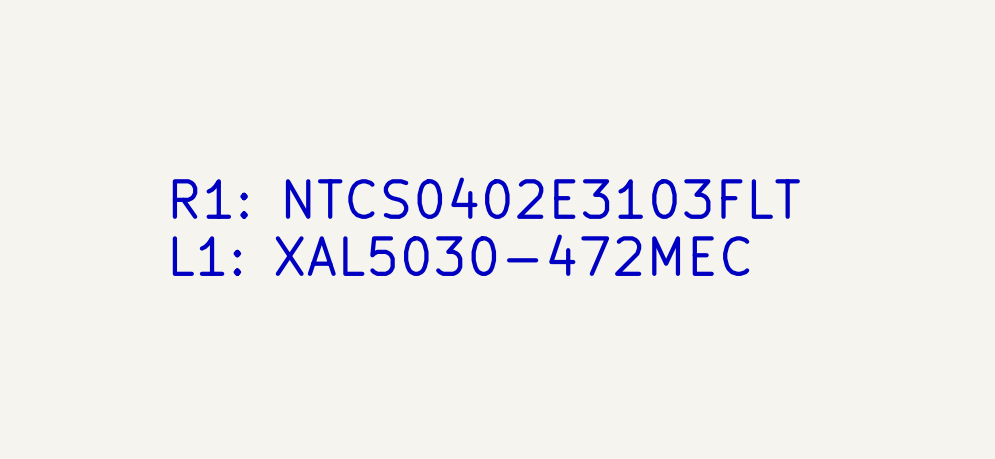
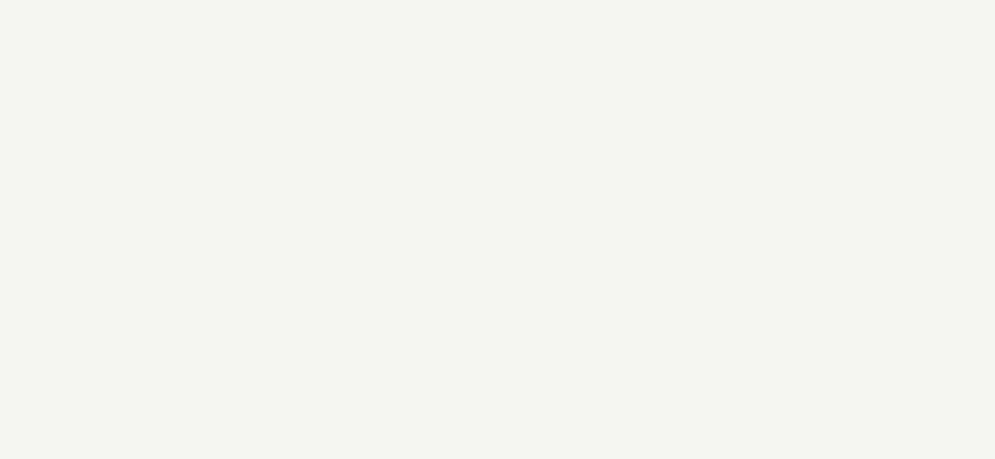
text: R1: NTCS0402E3103FLT (486, 198) -> none
text: L1: XAL5030-472MEC (461, 255) -> none

